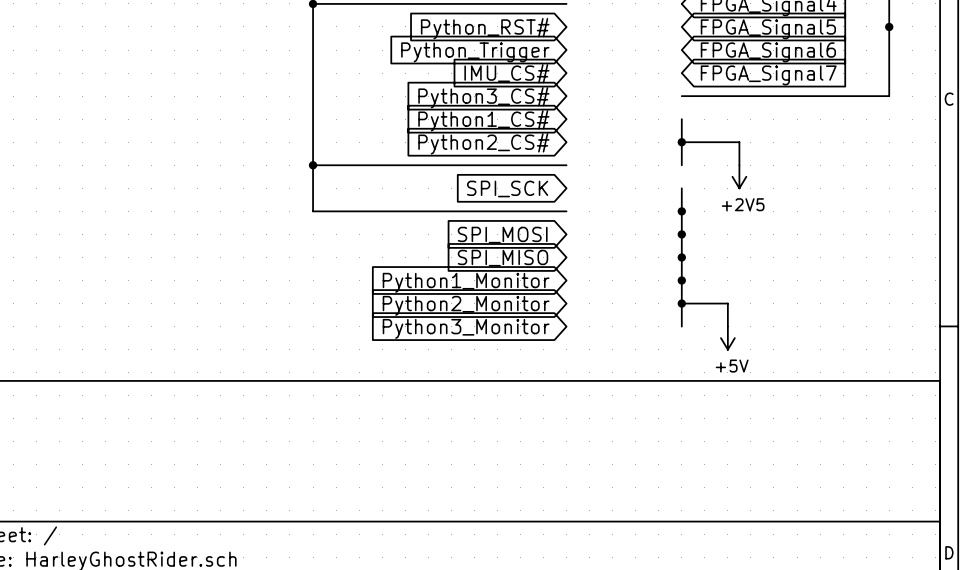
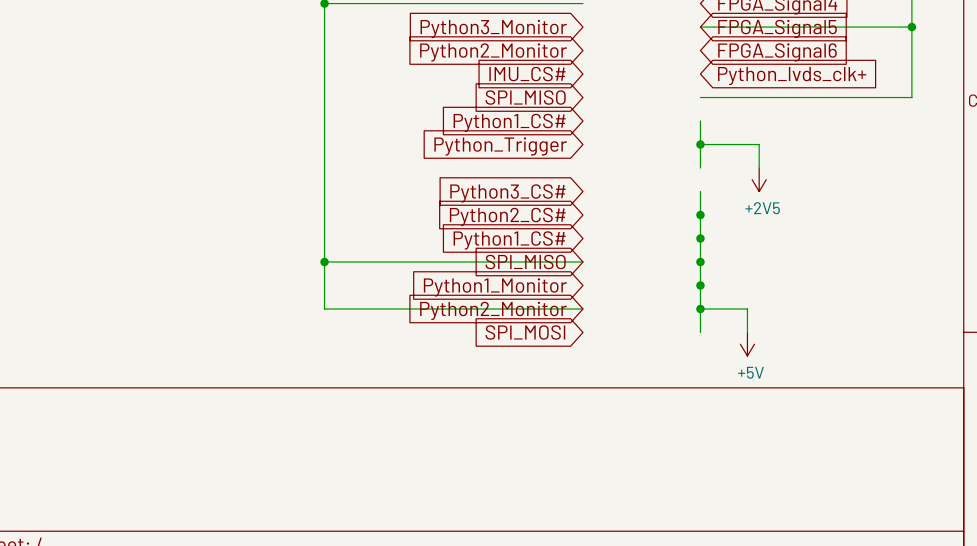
wire: none -> (700, 27) (911, 27)
global label: Python_RST# (485, 28) -> Python3_Monitor (493, 28)
global label: Python_Trigger (475, 52) -> Python2_Monitor (493, 52)
global label: FPGA_Signal7 (768, 75) -> Python_lvds_clk+ (792, 76)
global label: Python3_CS# (483, 97) -> SPI_MISO (525, 97)
global label: Python2_CS# (483, 143) -> Python_Trigger (500, 146)
wire: (313, 165) (566, 165) -> (324, 262) (582, 262)
junction: (313, 165) -> none
global label: SPI_SCK (507, 188) -> Python3_CS# (507, 193)
wire: (313, 211) (566, 211) -> (324, 215) (324, 308) (582, 308)
global label: none -> Python2_CS# (507, 216)
global label: SPI_MOSI (502, 235) -> Python1_CS# (509, 240)
junction: none -> (324, 262)
global label: Python3_Monitor (466, 328) -> SPI_MOSI (525, 332)

